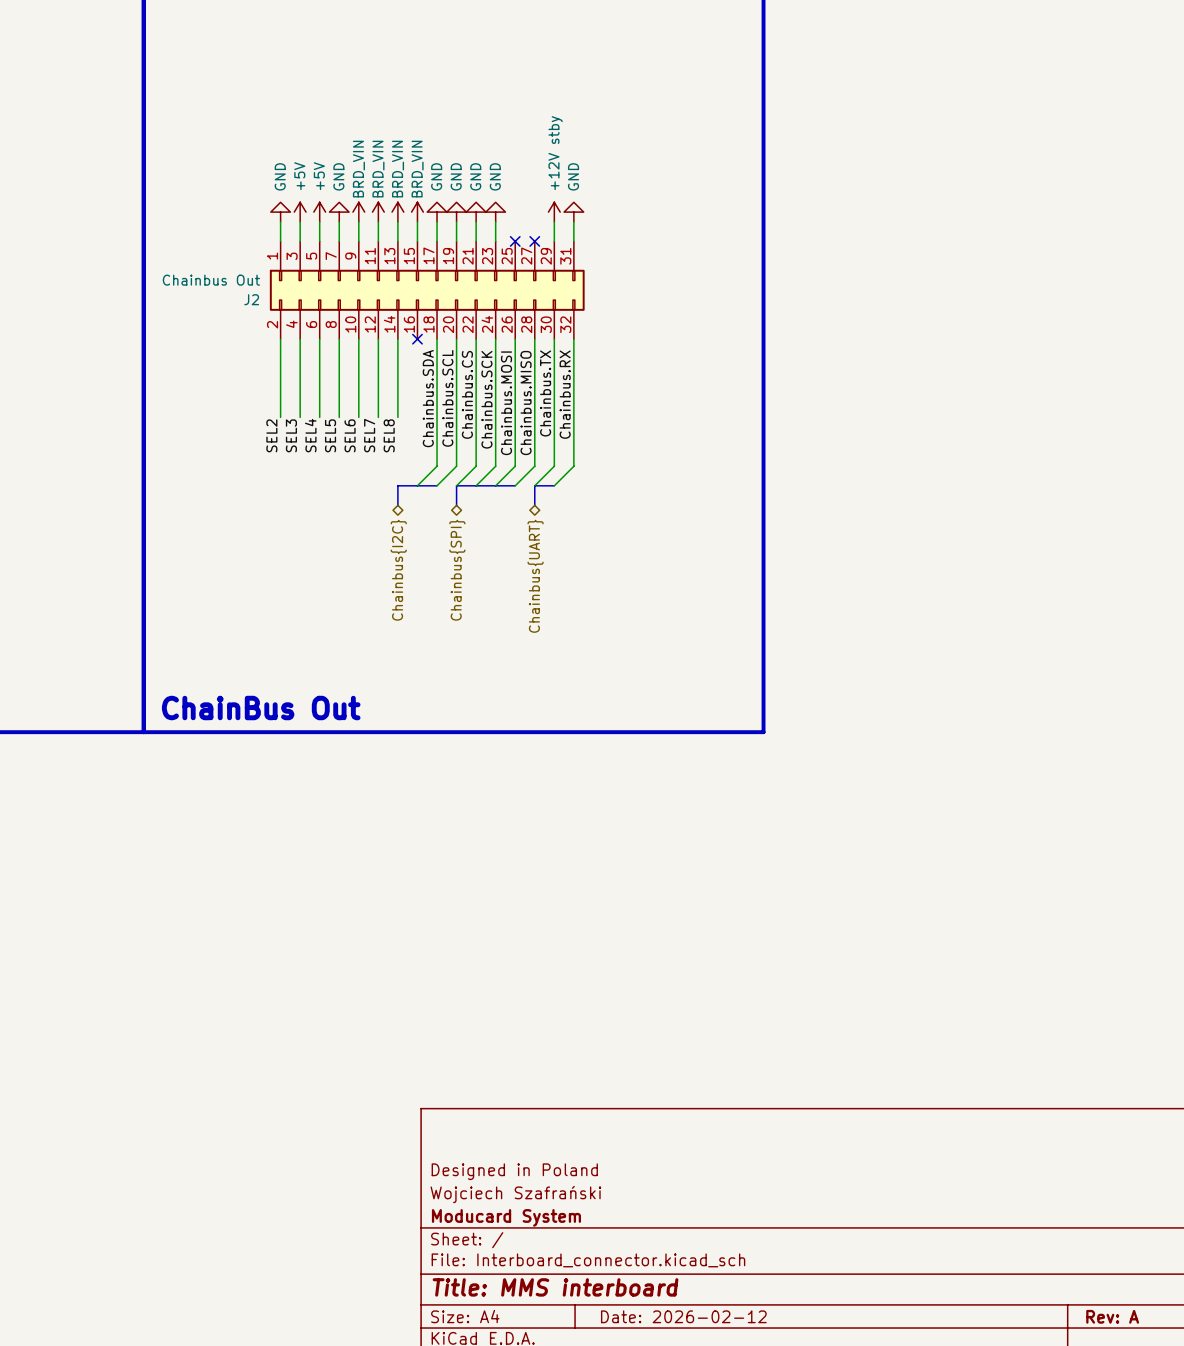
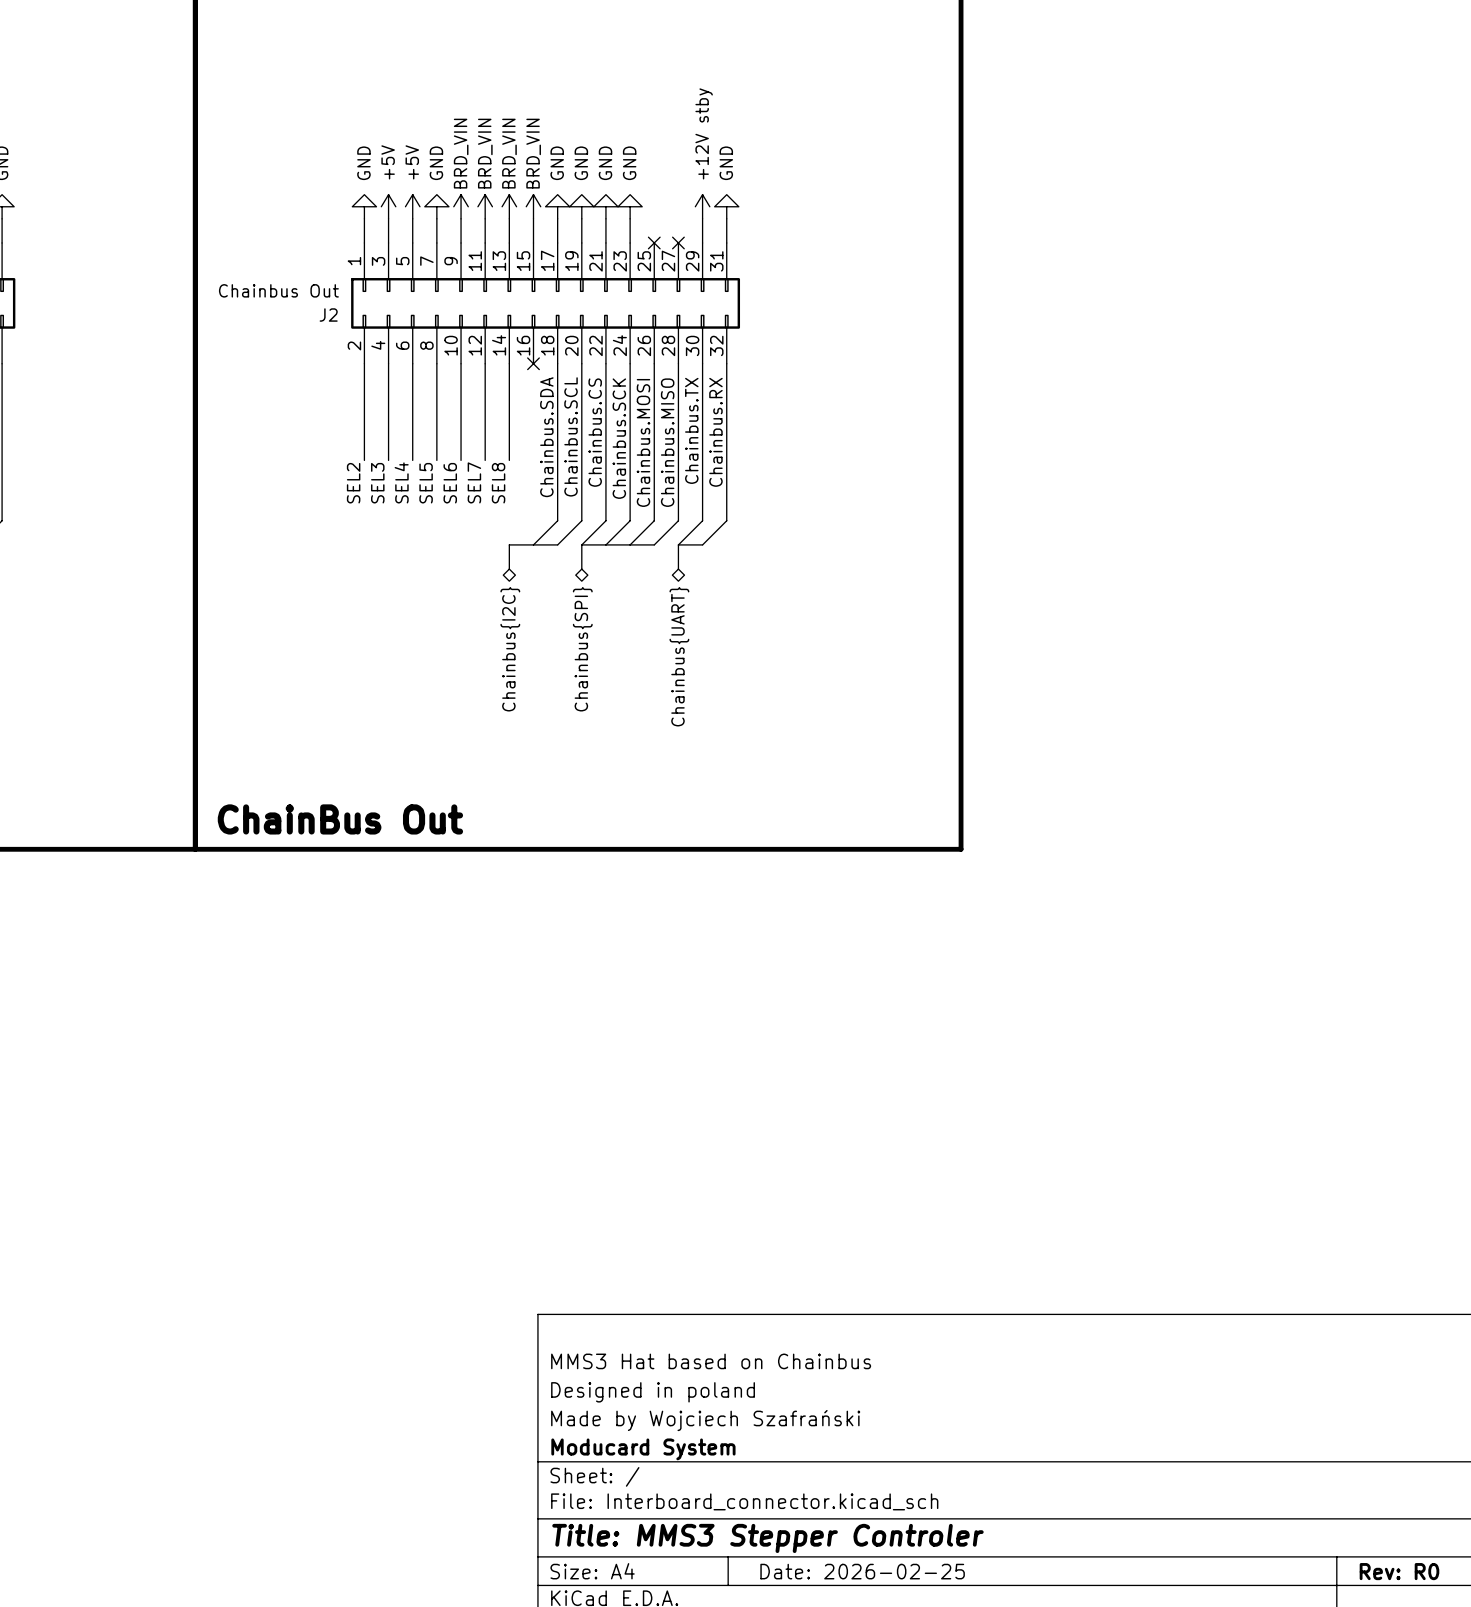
title block: none -> MMS3 Hat based on Chainbus (711, 1361)
title block: Designed in Poland (514, 1171) -> Designed in poland (653, 1392)
title block: Wojciech Szafrański (515, 1194) -> Made by Wojciech Szafrański (705, 1420)
title block: Title: MMS interboard (555, 1287) -> Title: MMS3 Stepper Controler (767, 1538)
title block: Date: 2026-02-12 (683, 1316) -> Date: 2026-02-25 (862, 1571)
title block: Rev: A (1112, 1316) -> Rev: R0 (1399, 1571)

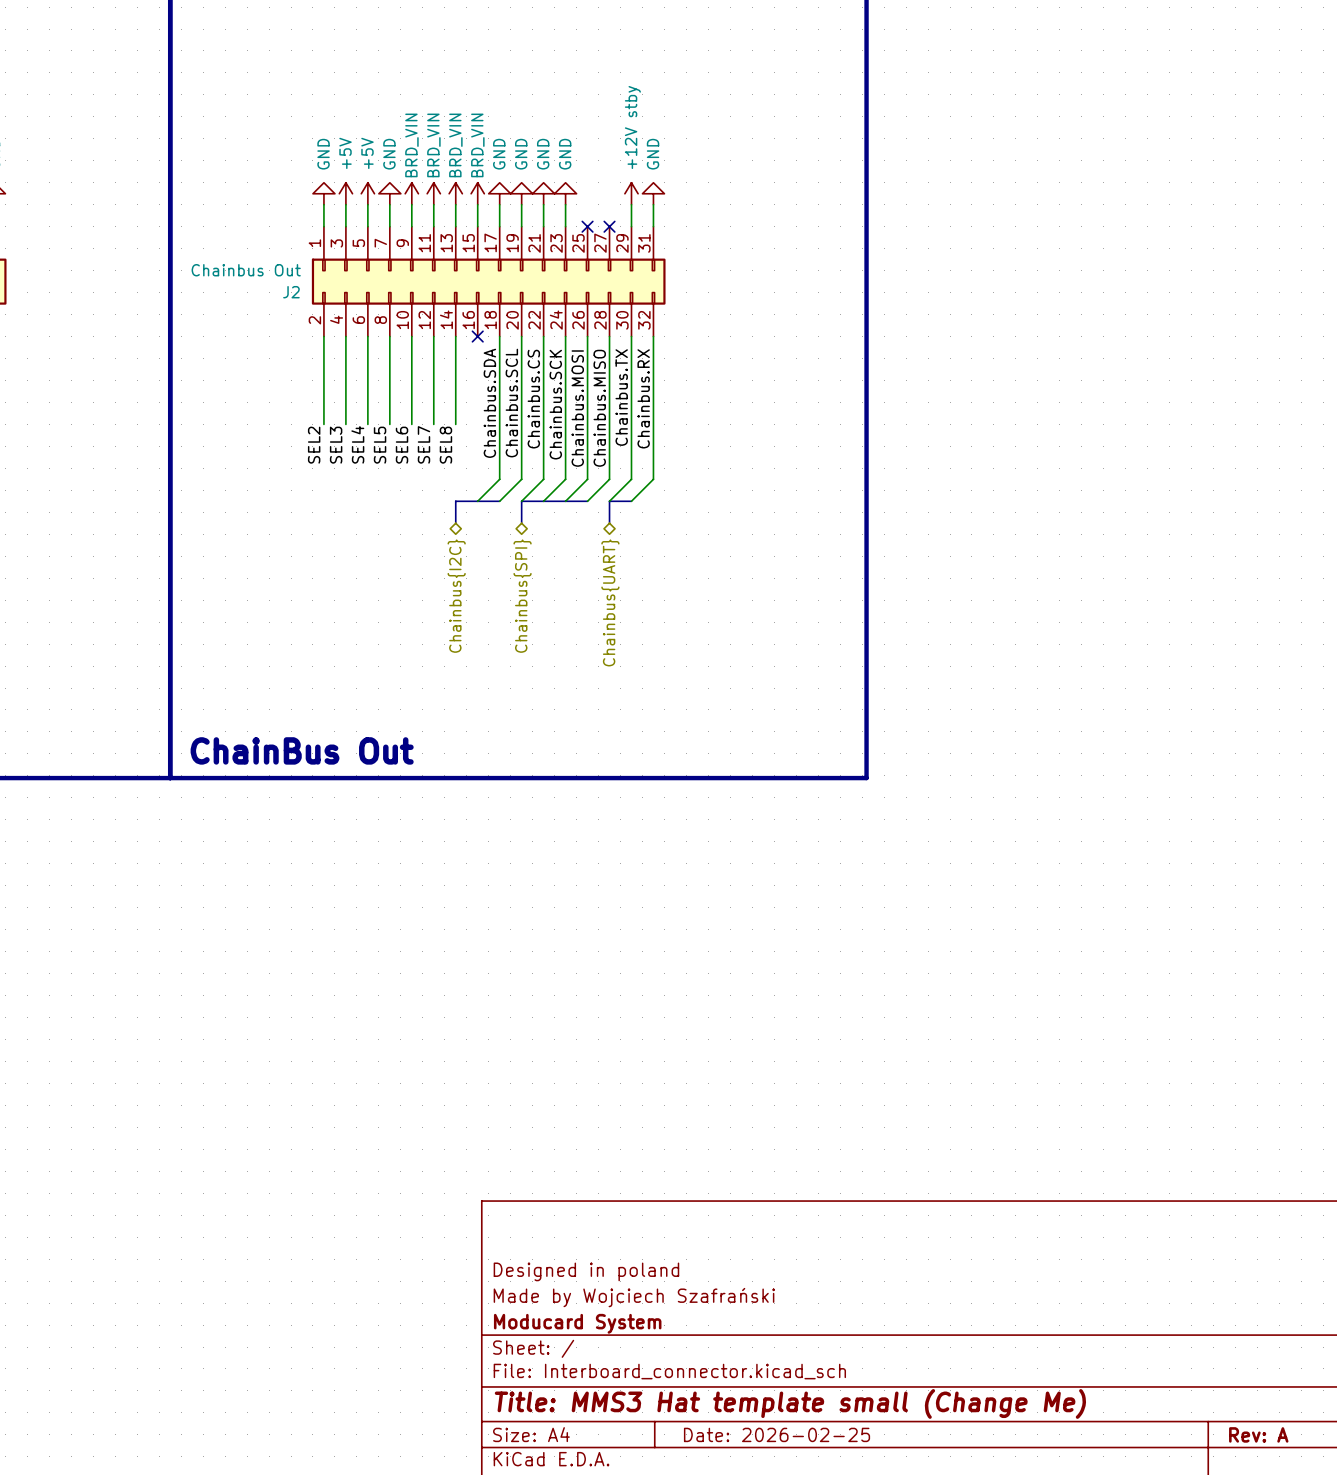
title block: MMS3 Hat based on Chainbus (711, 1361) -> none
title block: Title: MMS3 Stepper Controler (767, 1538) -> Title: MMS3 Hat template small (Change Me) (790, 1403)
title block: Rev: R0 (1399, 1571) -> Rev: A (1258, 1434)

